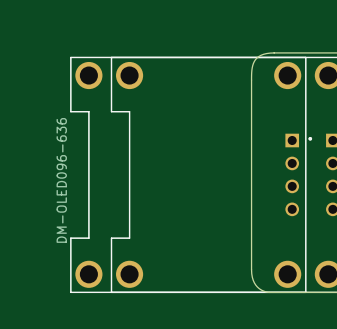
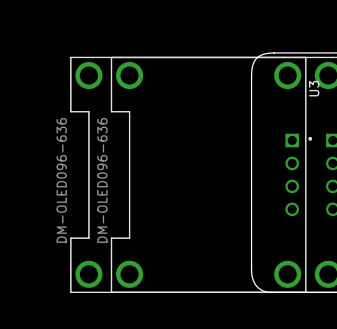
U3 name: none -> U3 (314, 88)
part value: none -> DM-OLED096-636 (102, 180)

